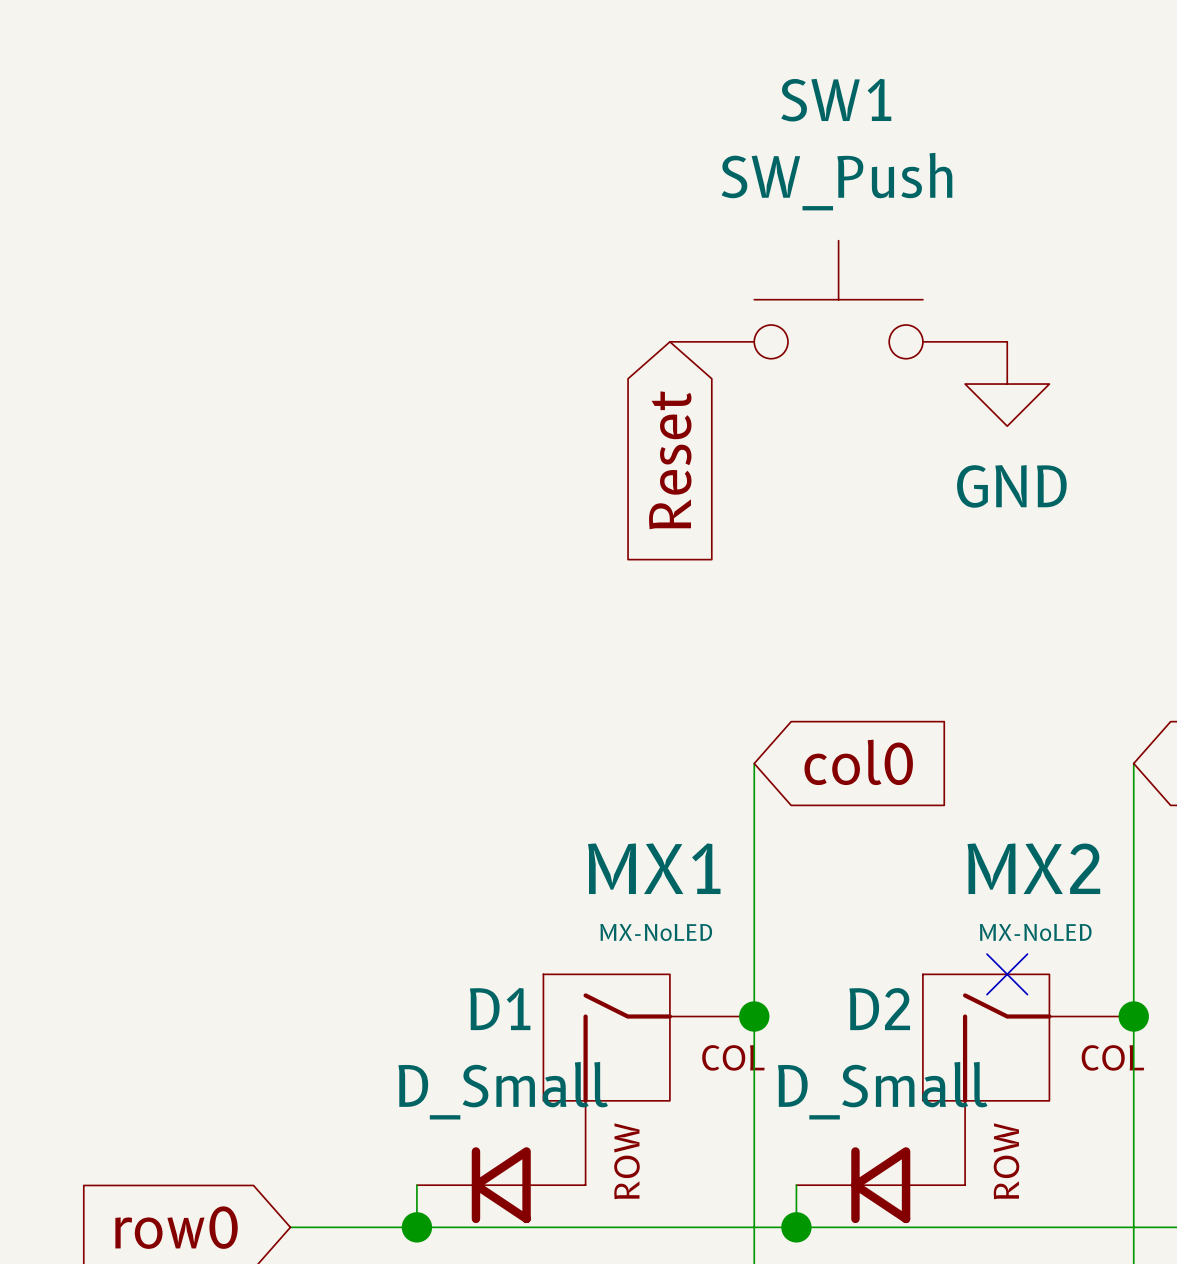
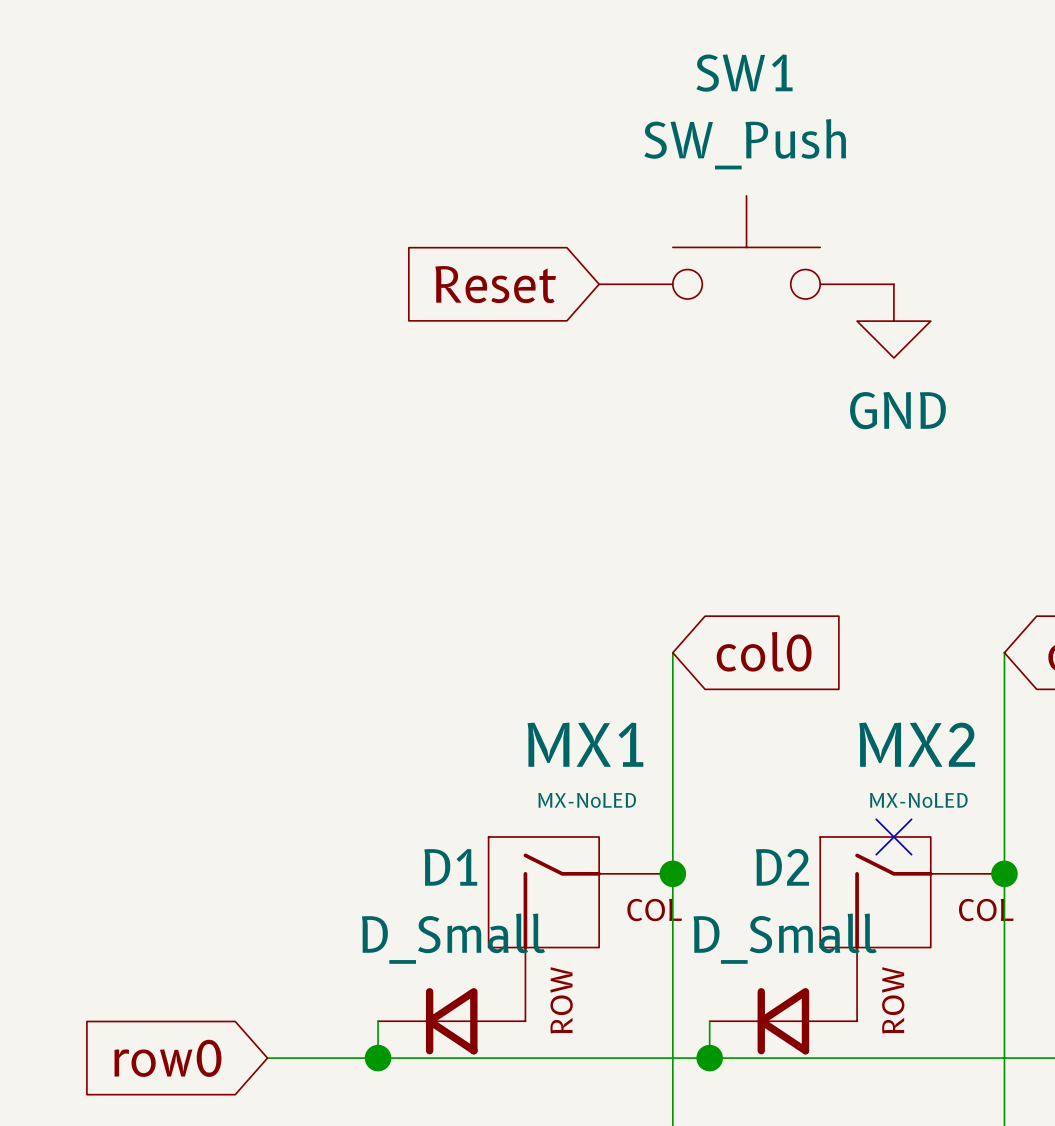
global label rotation: 0° (670, 460) -> 90° clockwise (495, 284)

